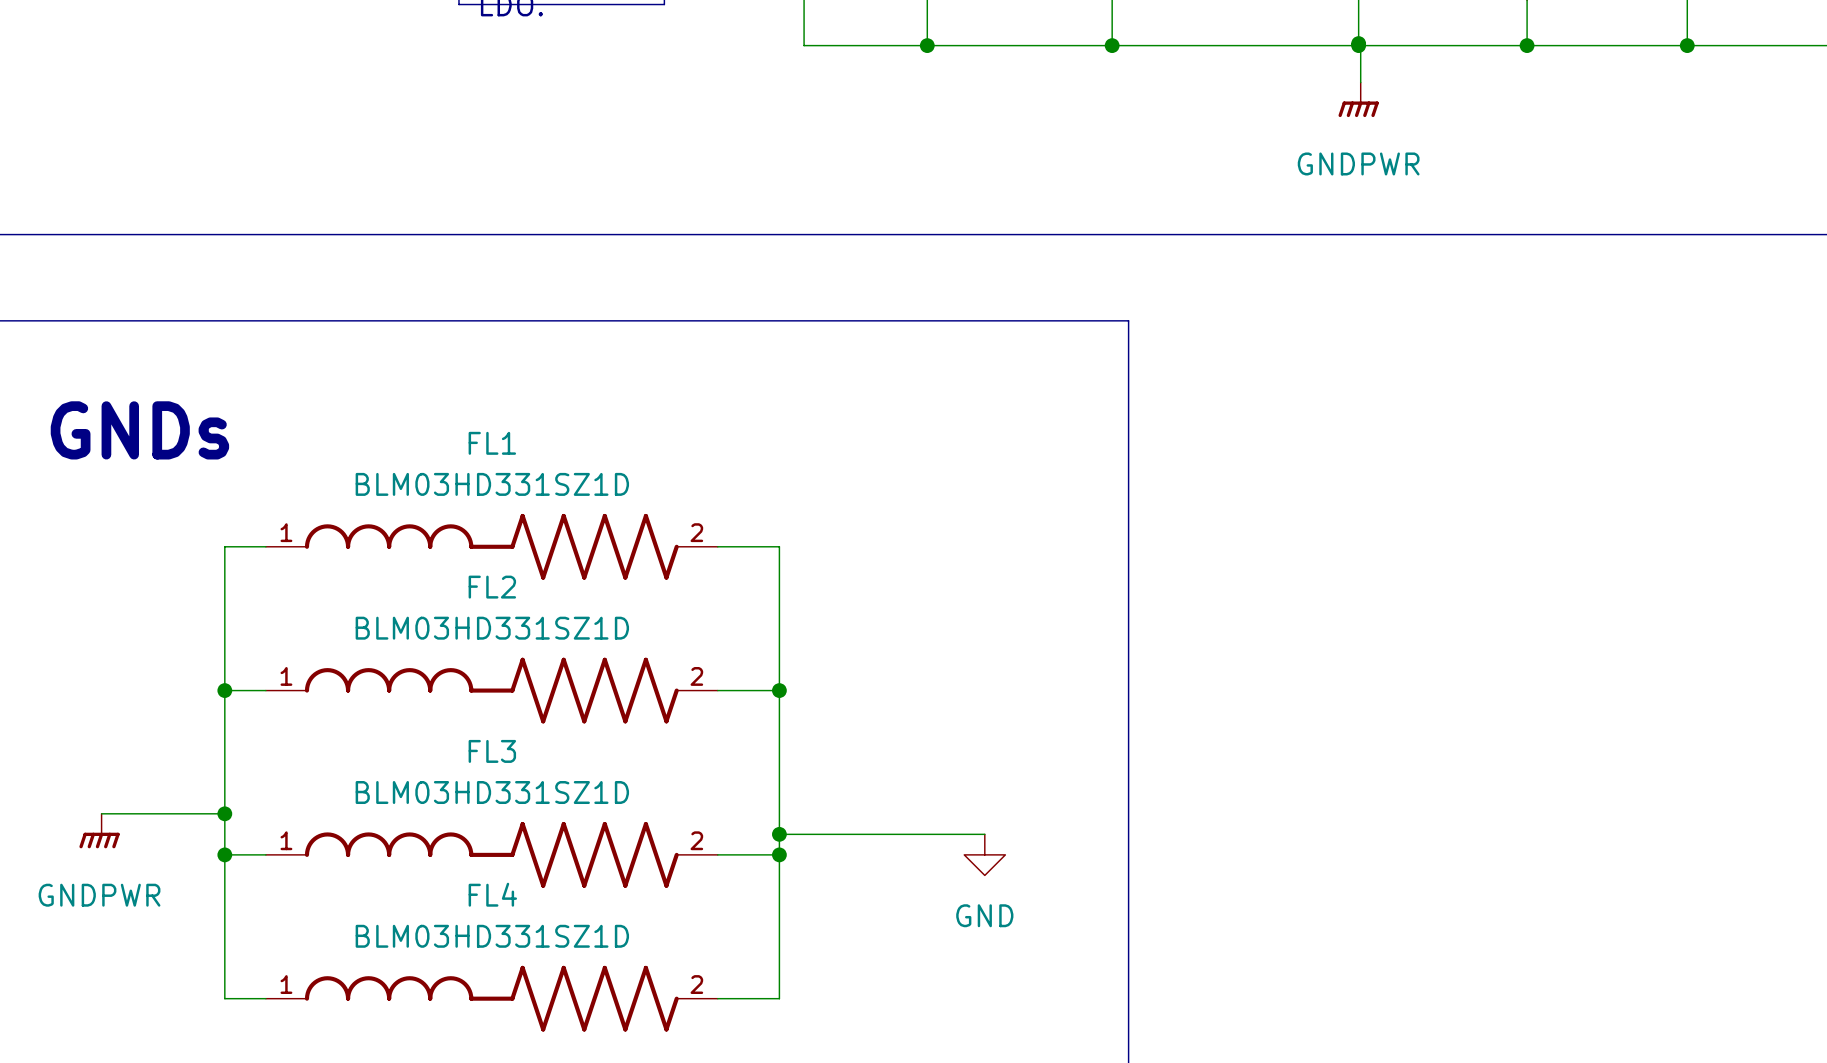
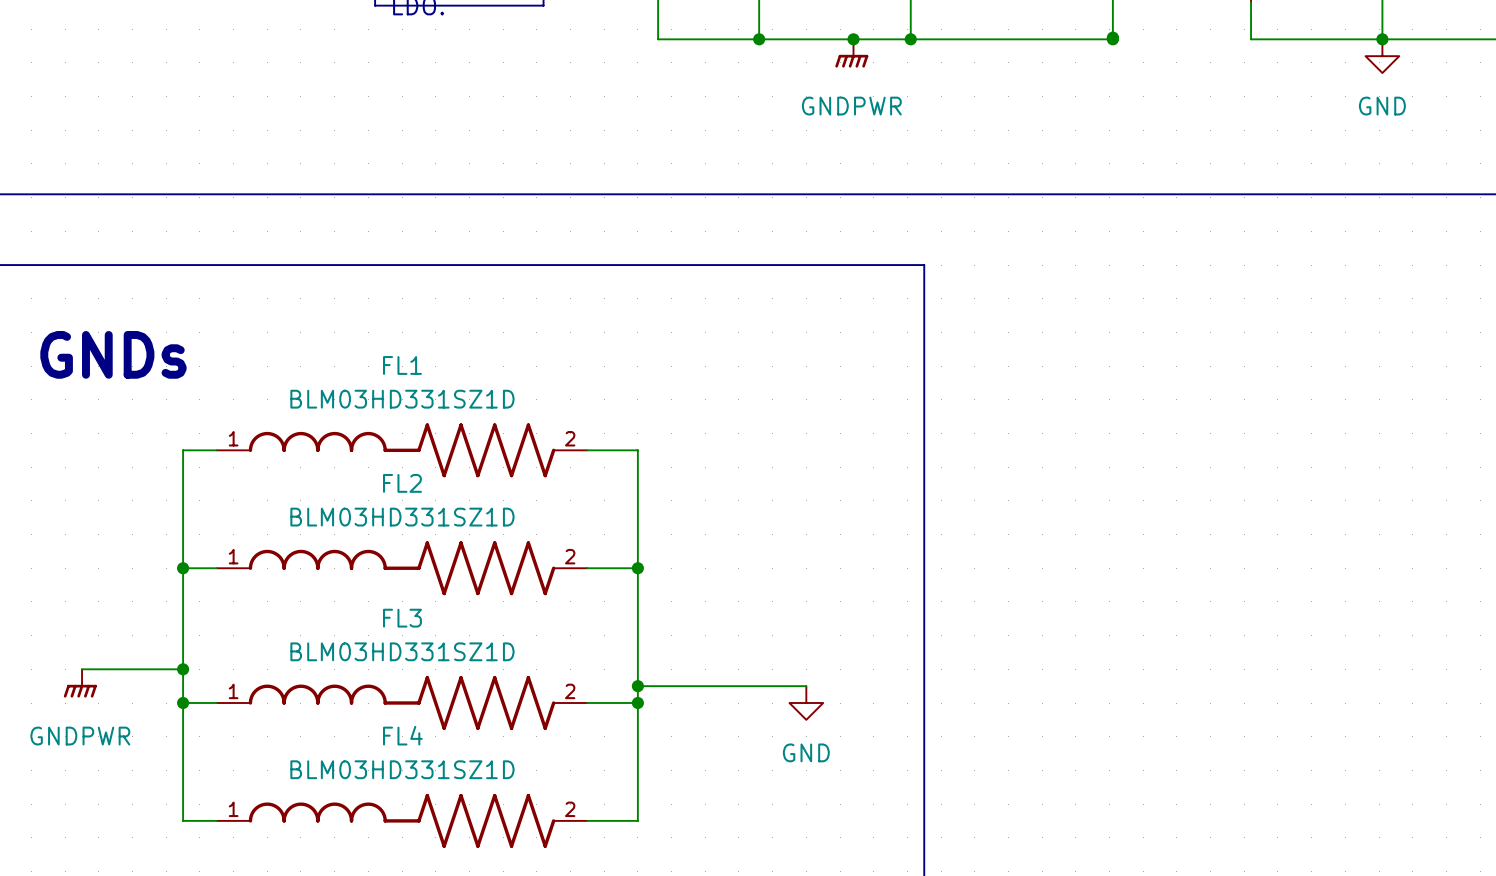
wire: (1358, 43) (1360, 43) (1360, 82) -> none
junction: none -> (853, 39)
wire: (1358, 45) (1527, 45) -> none
junction: (1527, 45) -> none
power symbol: none -> GND (1382, 56)
power symbol position: GNDPWR (1358, 99) -> GNDPWR (851, 53)

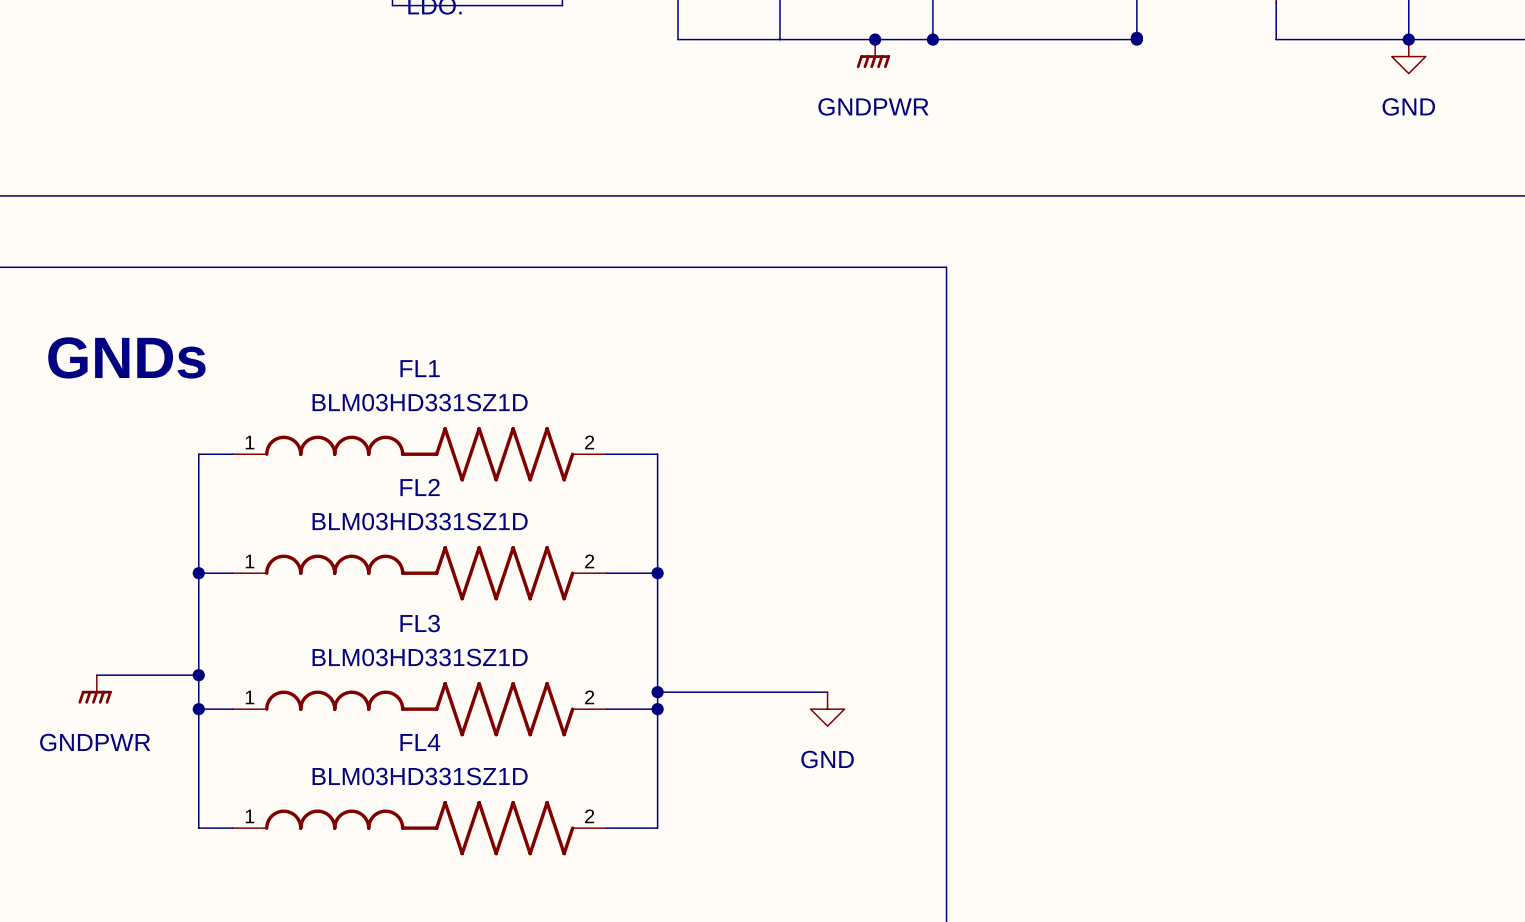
junction: (759, 39) -> none

